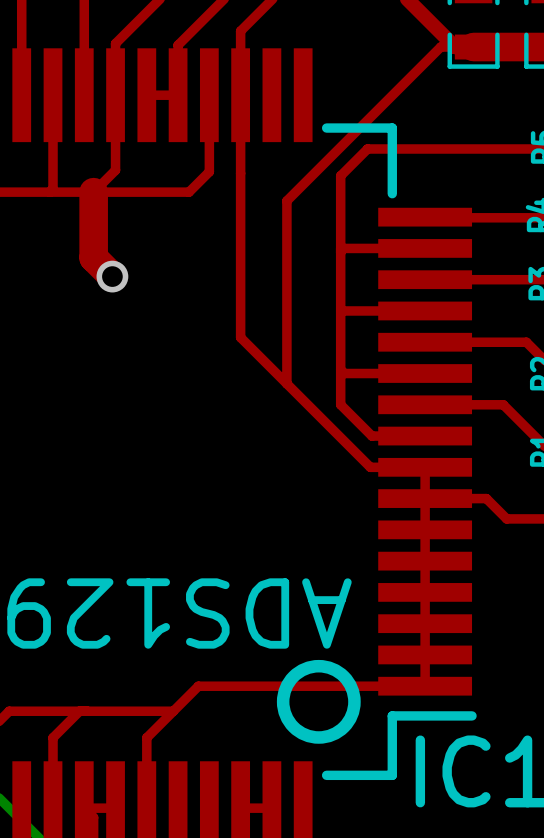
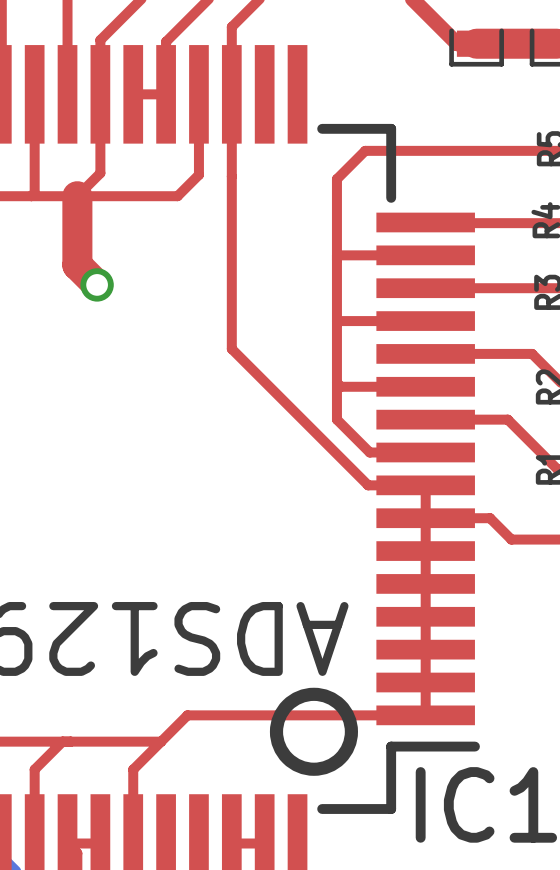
top track: (458, 47) (440, 47) (286, 200) (286, 383) -> none

